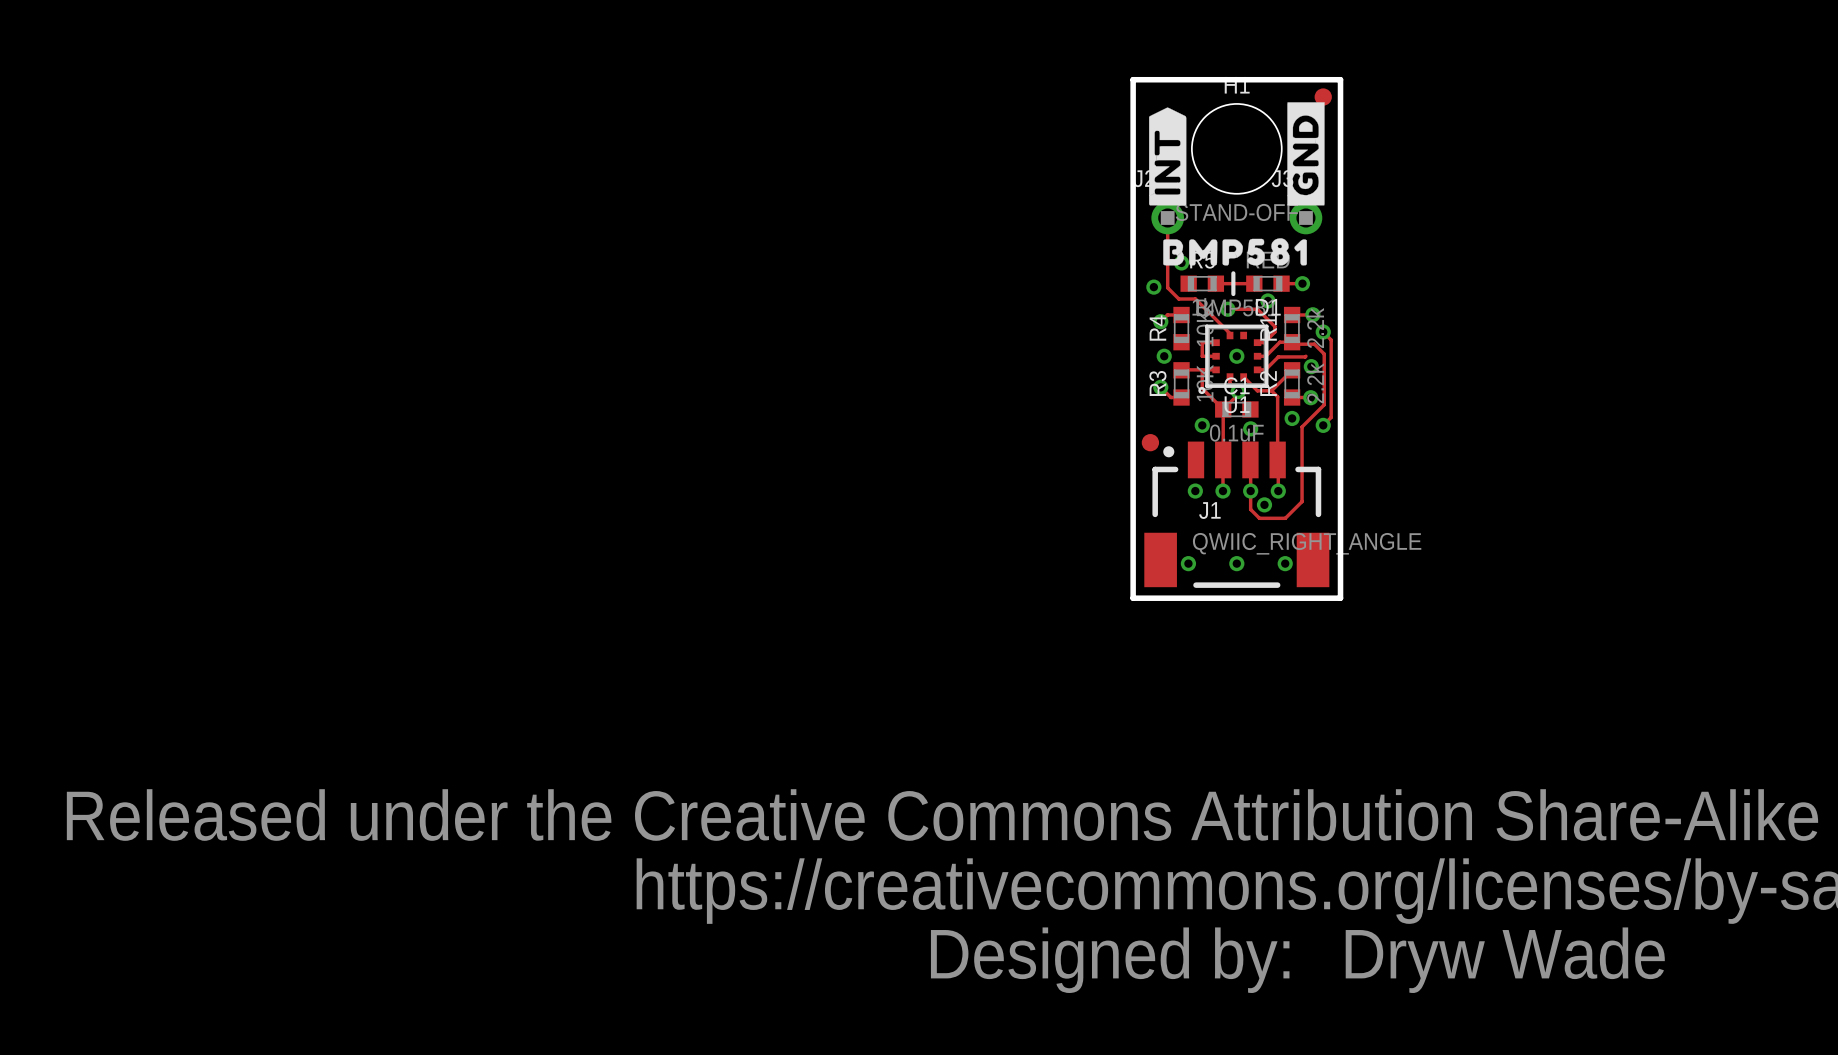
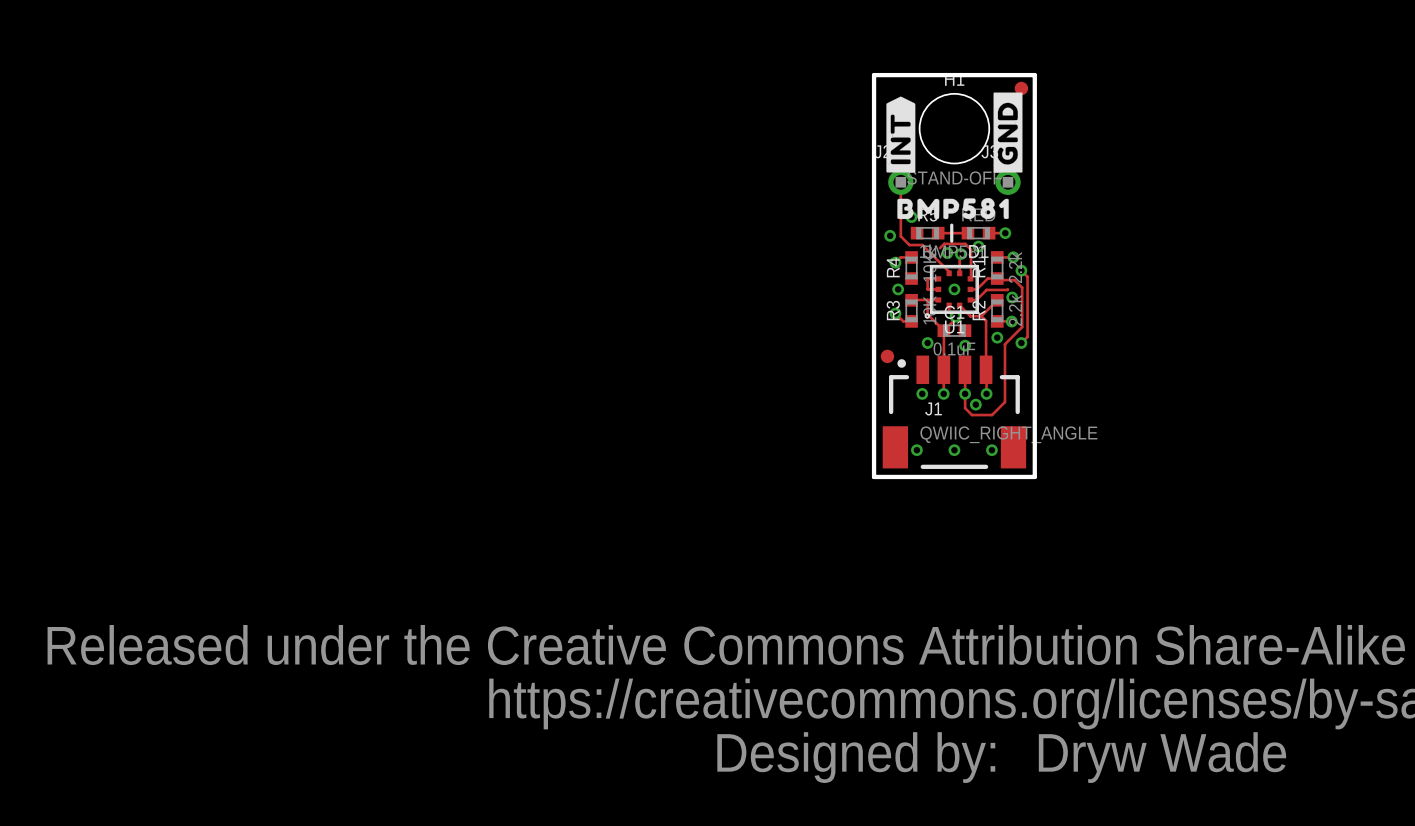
track: (1227, 309) (1257, 309) (1274, 326) (1274, 332) (1264, 342) (1257, 342) -> (939, 248) (944, 243) (965, 243) (971, 249) (970, 278)
track: none -> (960, 254) (959, 273)
via: none -> (960, 254)

